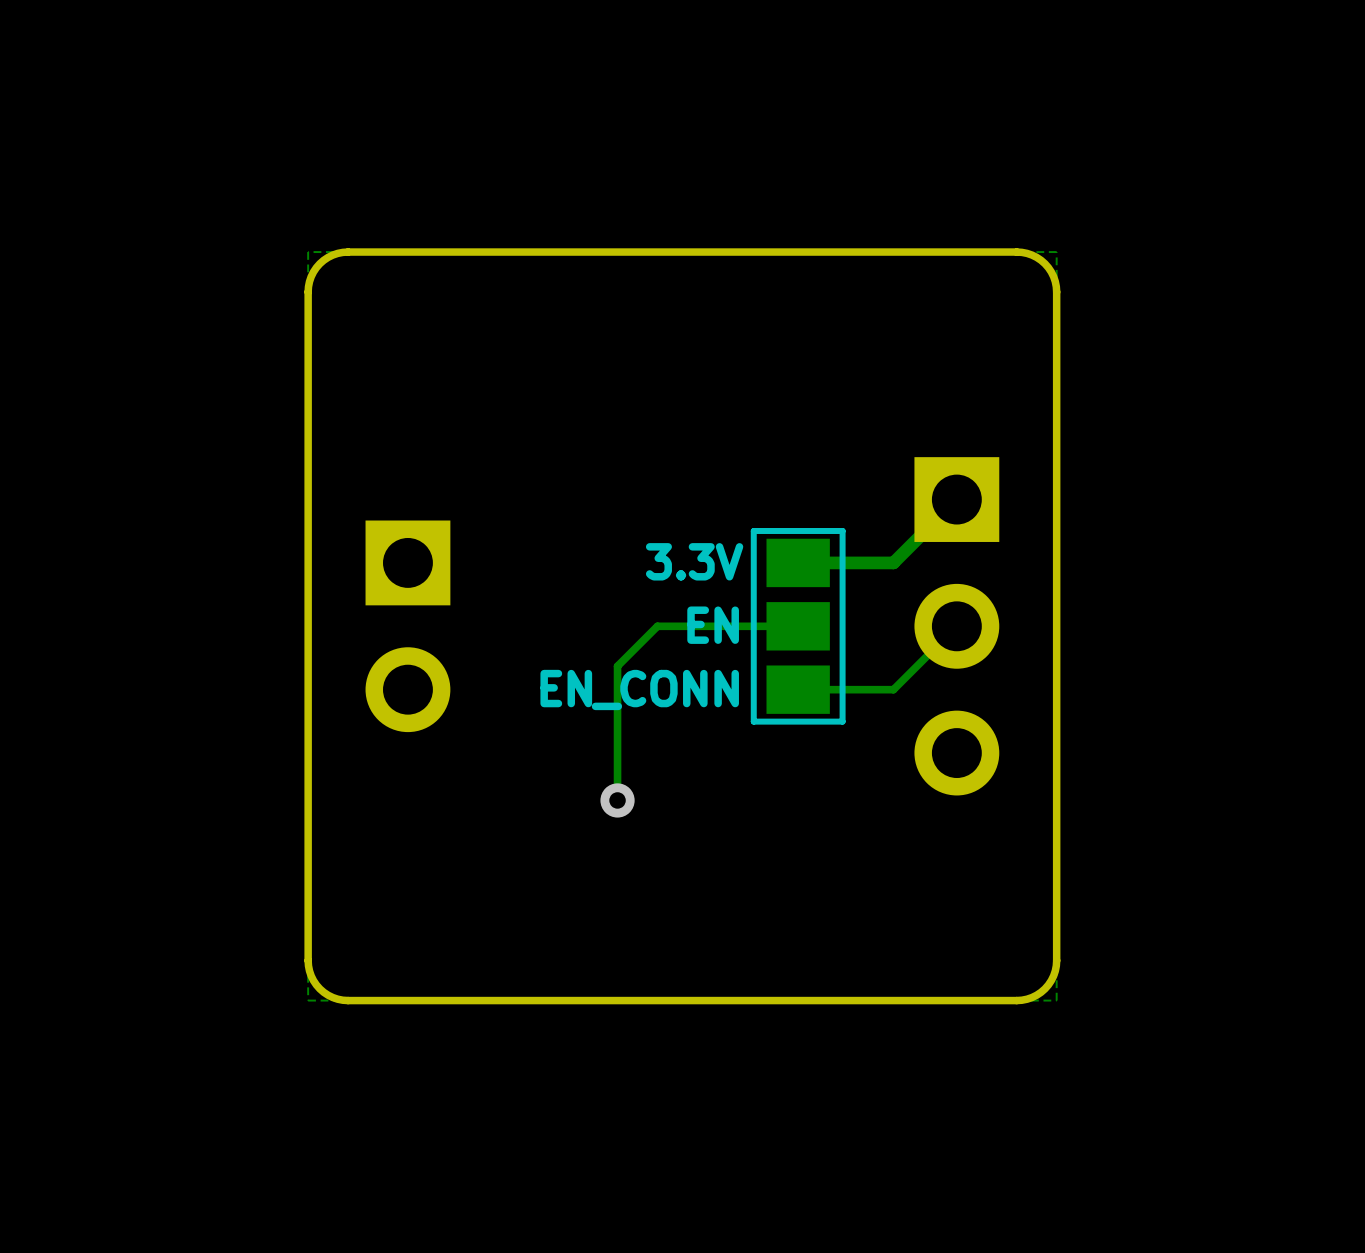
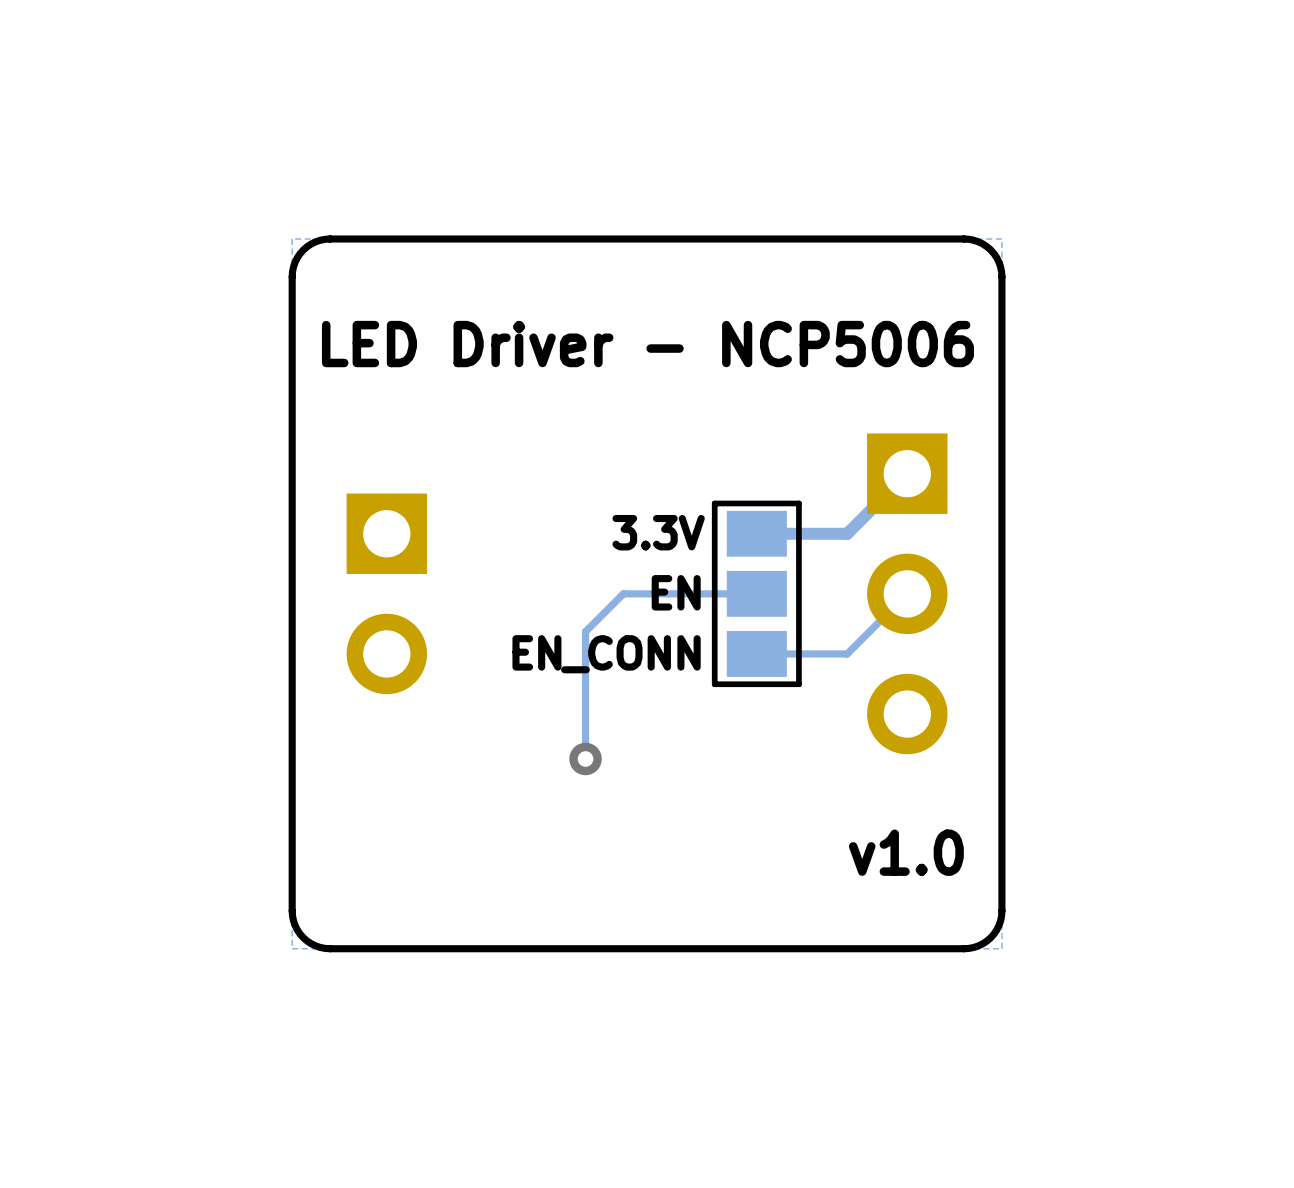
text: none -> LED Driver - NCP5006 (647, 344)
text: none -> v1.0 (906, 852)

